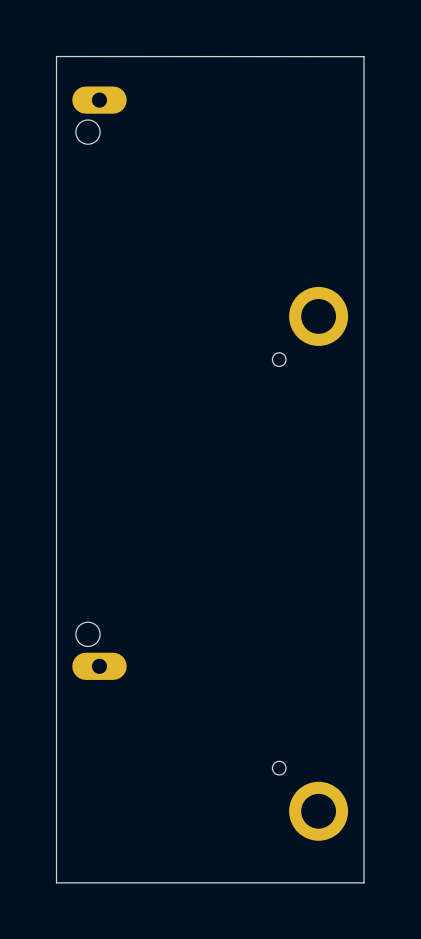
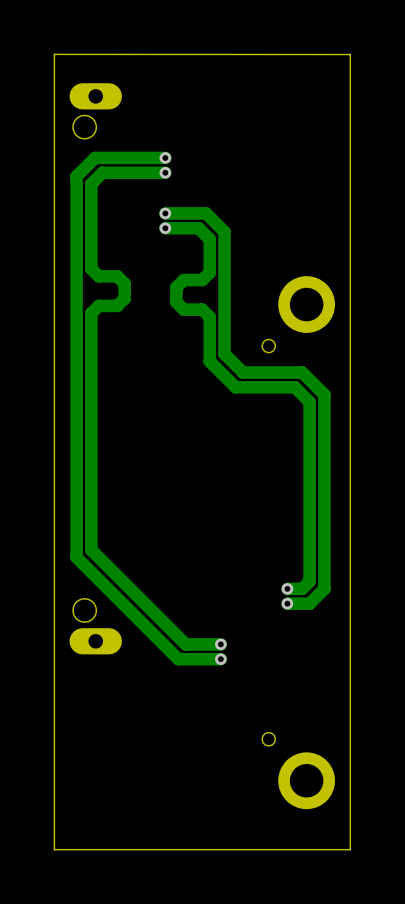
track: none -> (165, 157) (95, 157) (76, 176) (76, 557) (178, 659) (220, 659)
via: none -> (165, 157)
track: none -> (165, 172) (102, 172) (91, 183) (91, 268) (98, 276) (117, 276) (124, 283) (124, 298) (117, 305) (98, 305) (91, 313) (91, 550) (185, 644) (220, 644)
via: none -> (165, 172)
track: none -> (165, 213) (206, 213) (224, 231) (224, 354) (243, 372) (302, 372) (324, 394) (324, 588) (309, 603) (287, 603)
via: none -> (165, 213)
track: none -> (165, 228) (198, 228) (209, 239) (209, 272) (202, 280) (183, 280) (176, 287) (176, 302) (183, 309) (202, 309) (209, 317) (209, 361) (235, 387) (294, 387) (309, 402) (309, 581) (302, 588) (287, 588)
via: none -> (165, 228)
via: none -> (287, 588)
via: none -> (287, 603)
via: none -> (220, 644)
via: none -> (220, 659)

